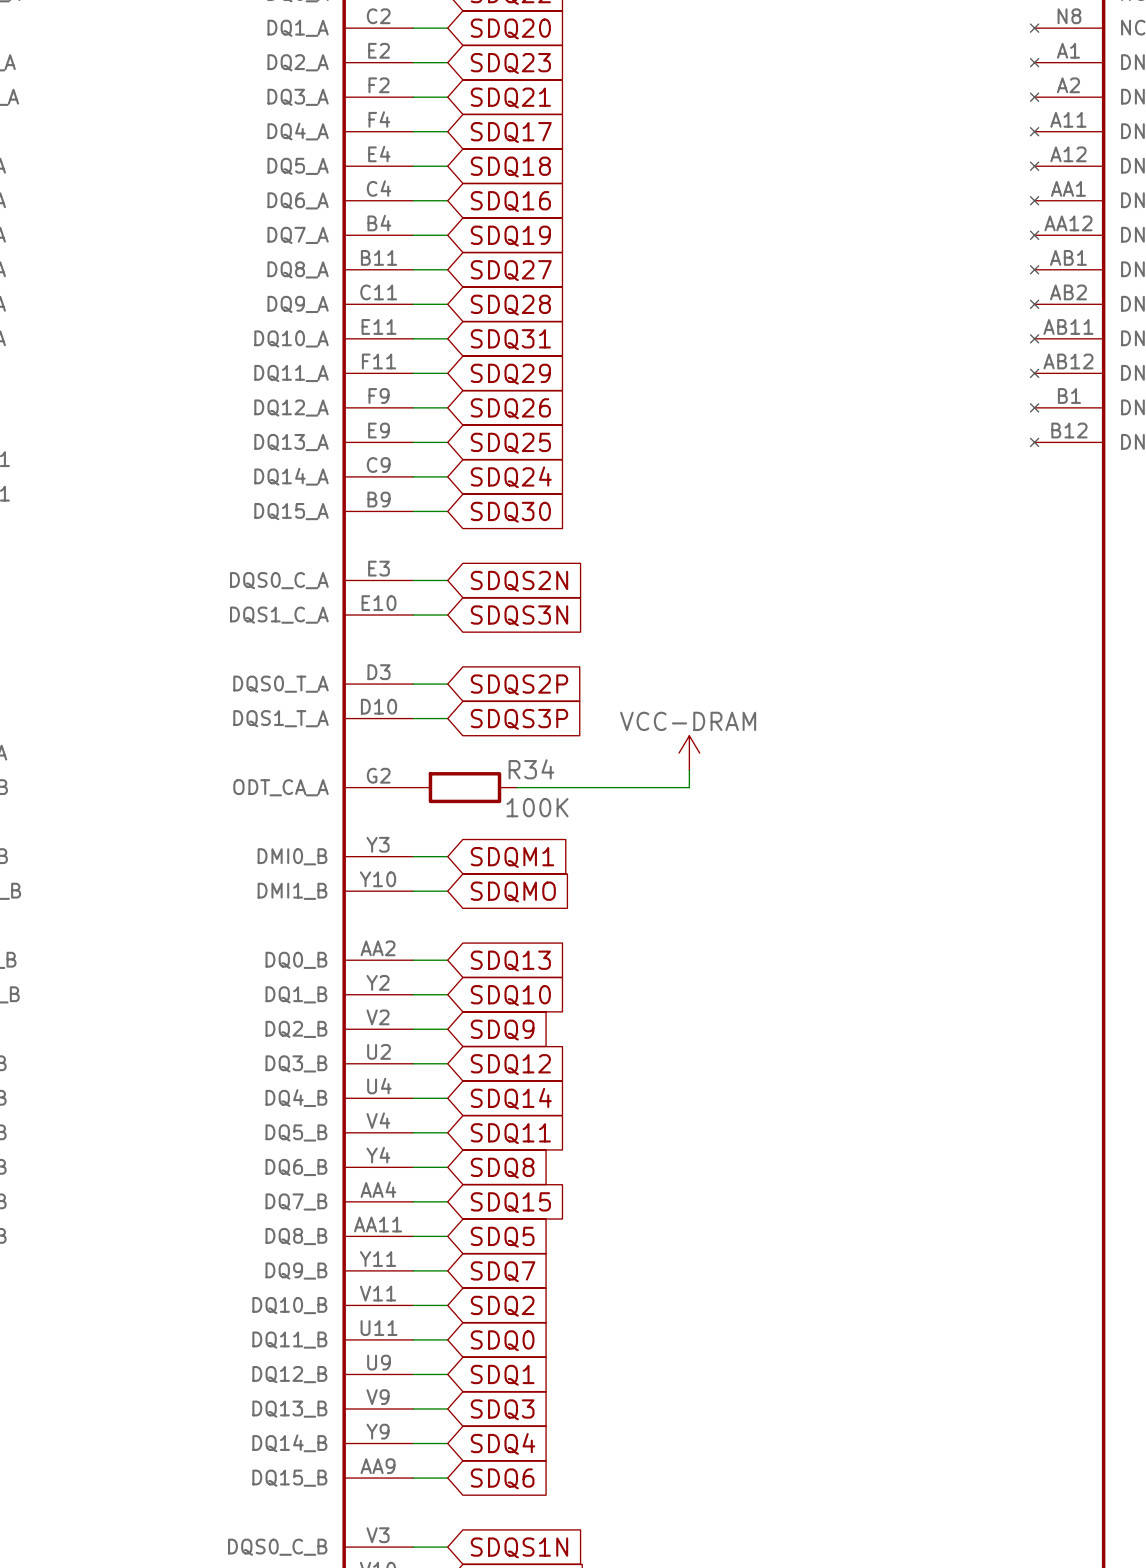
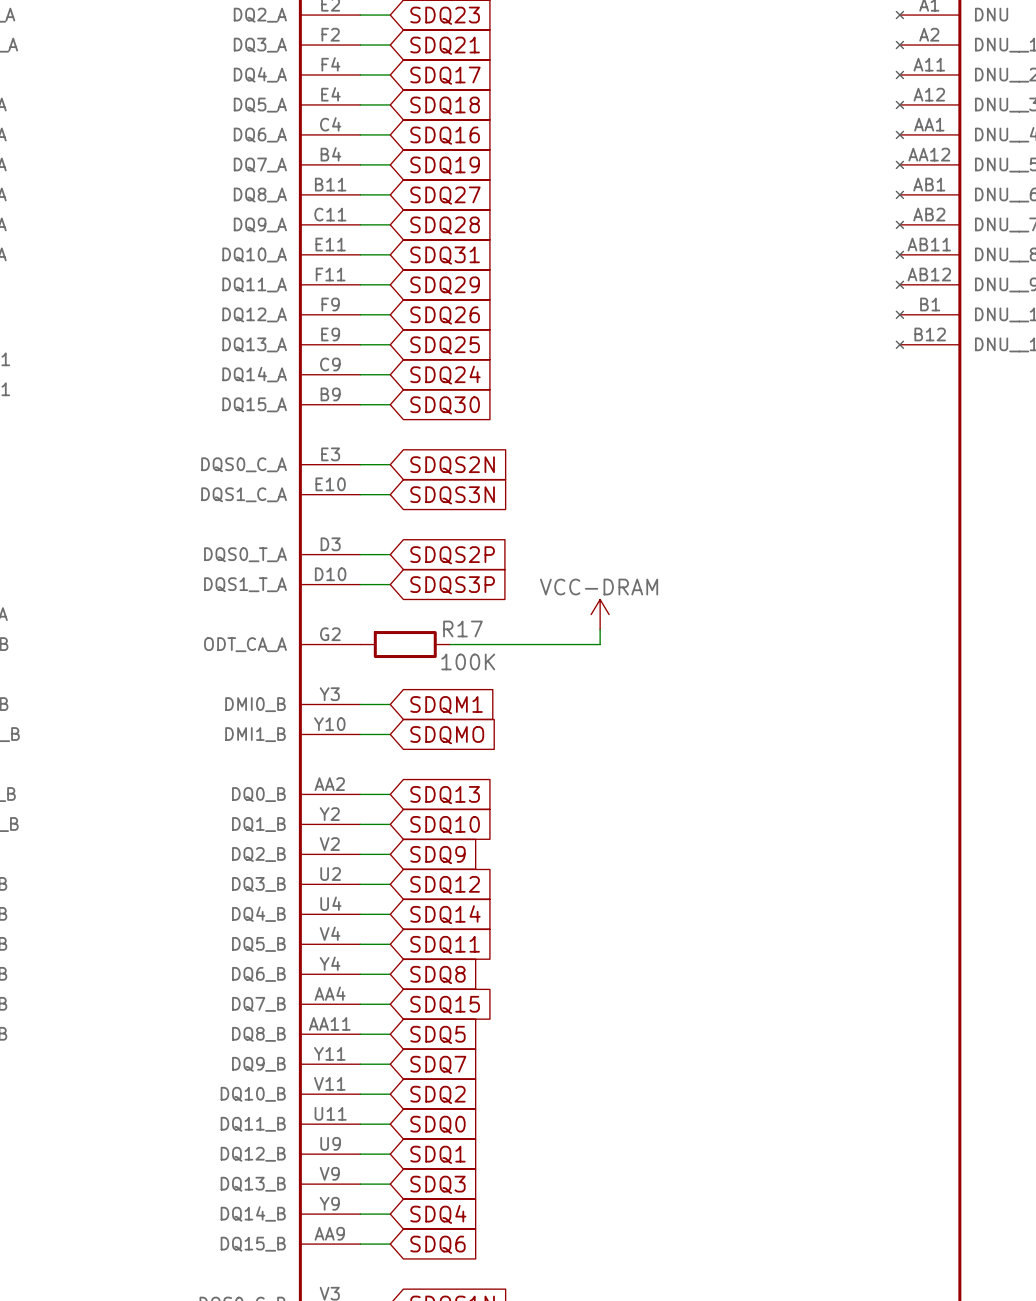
R34 name: R34 (531, 769) -> R17 (462, 628)

